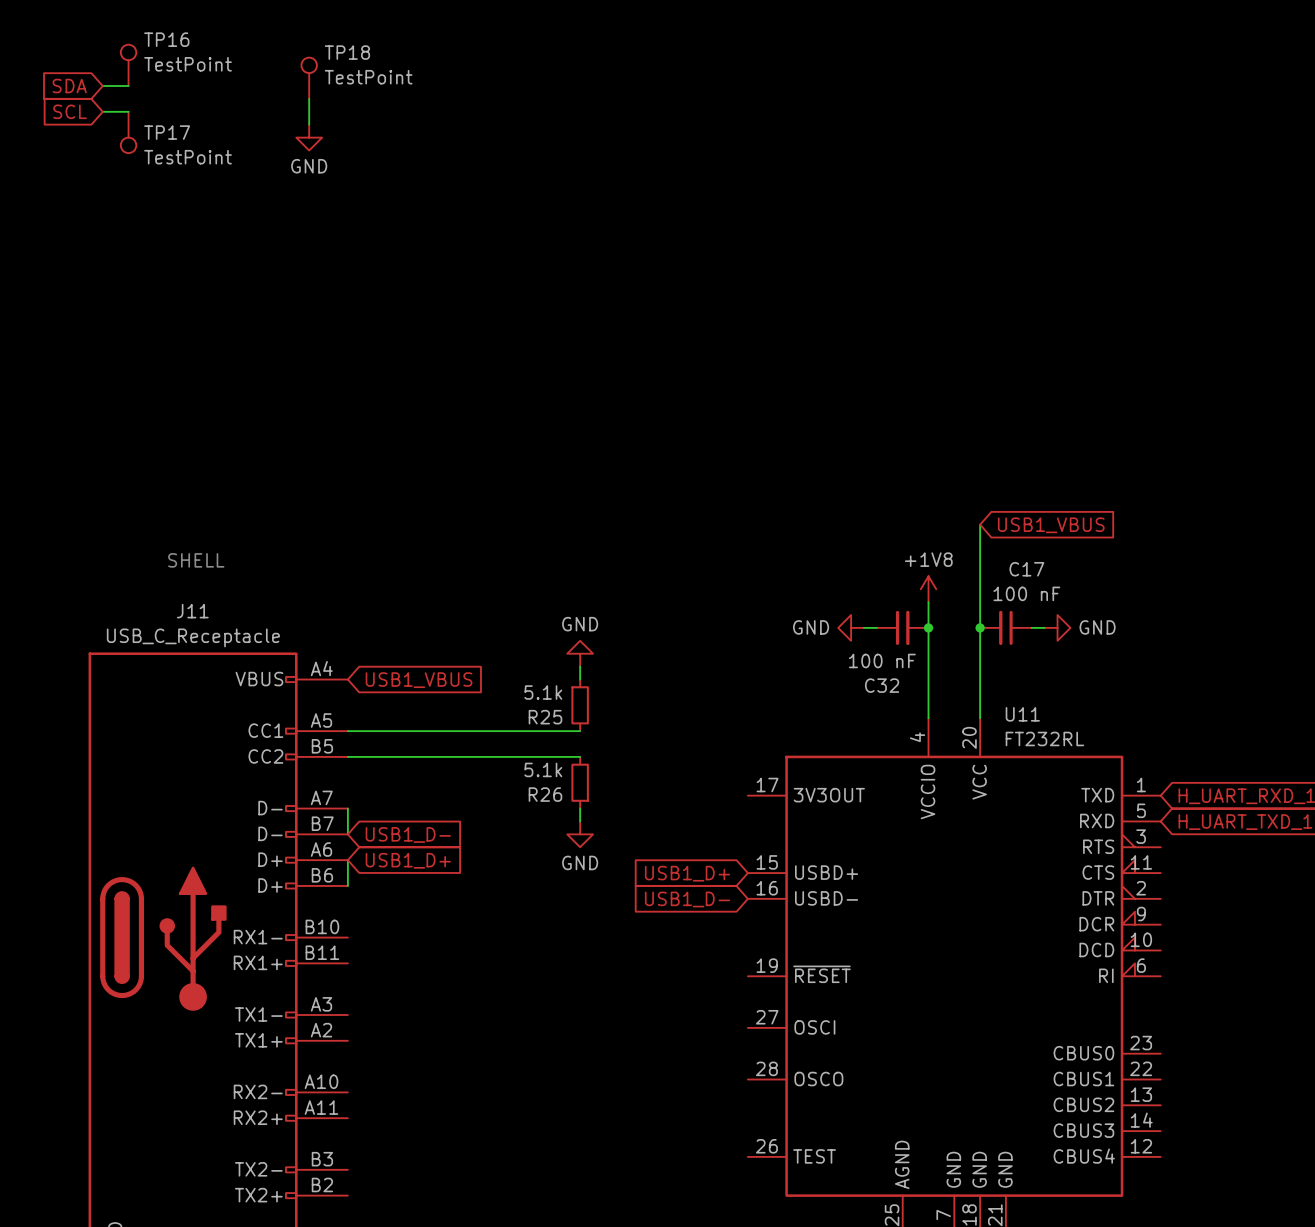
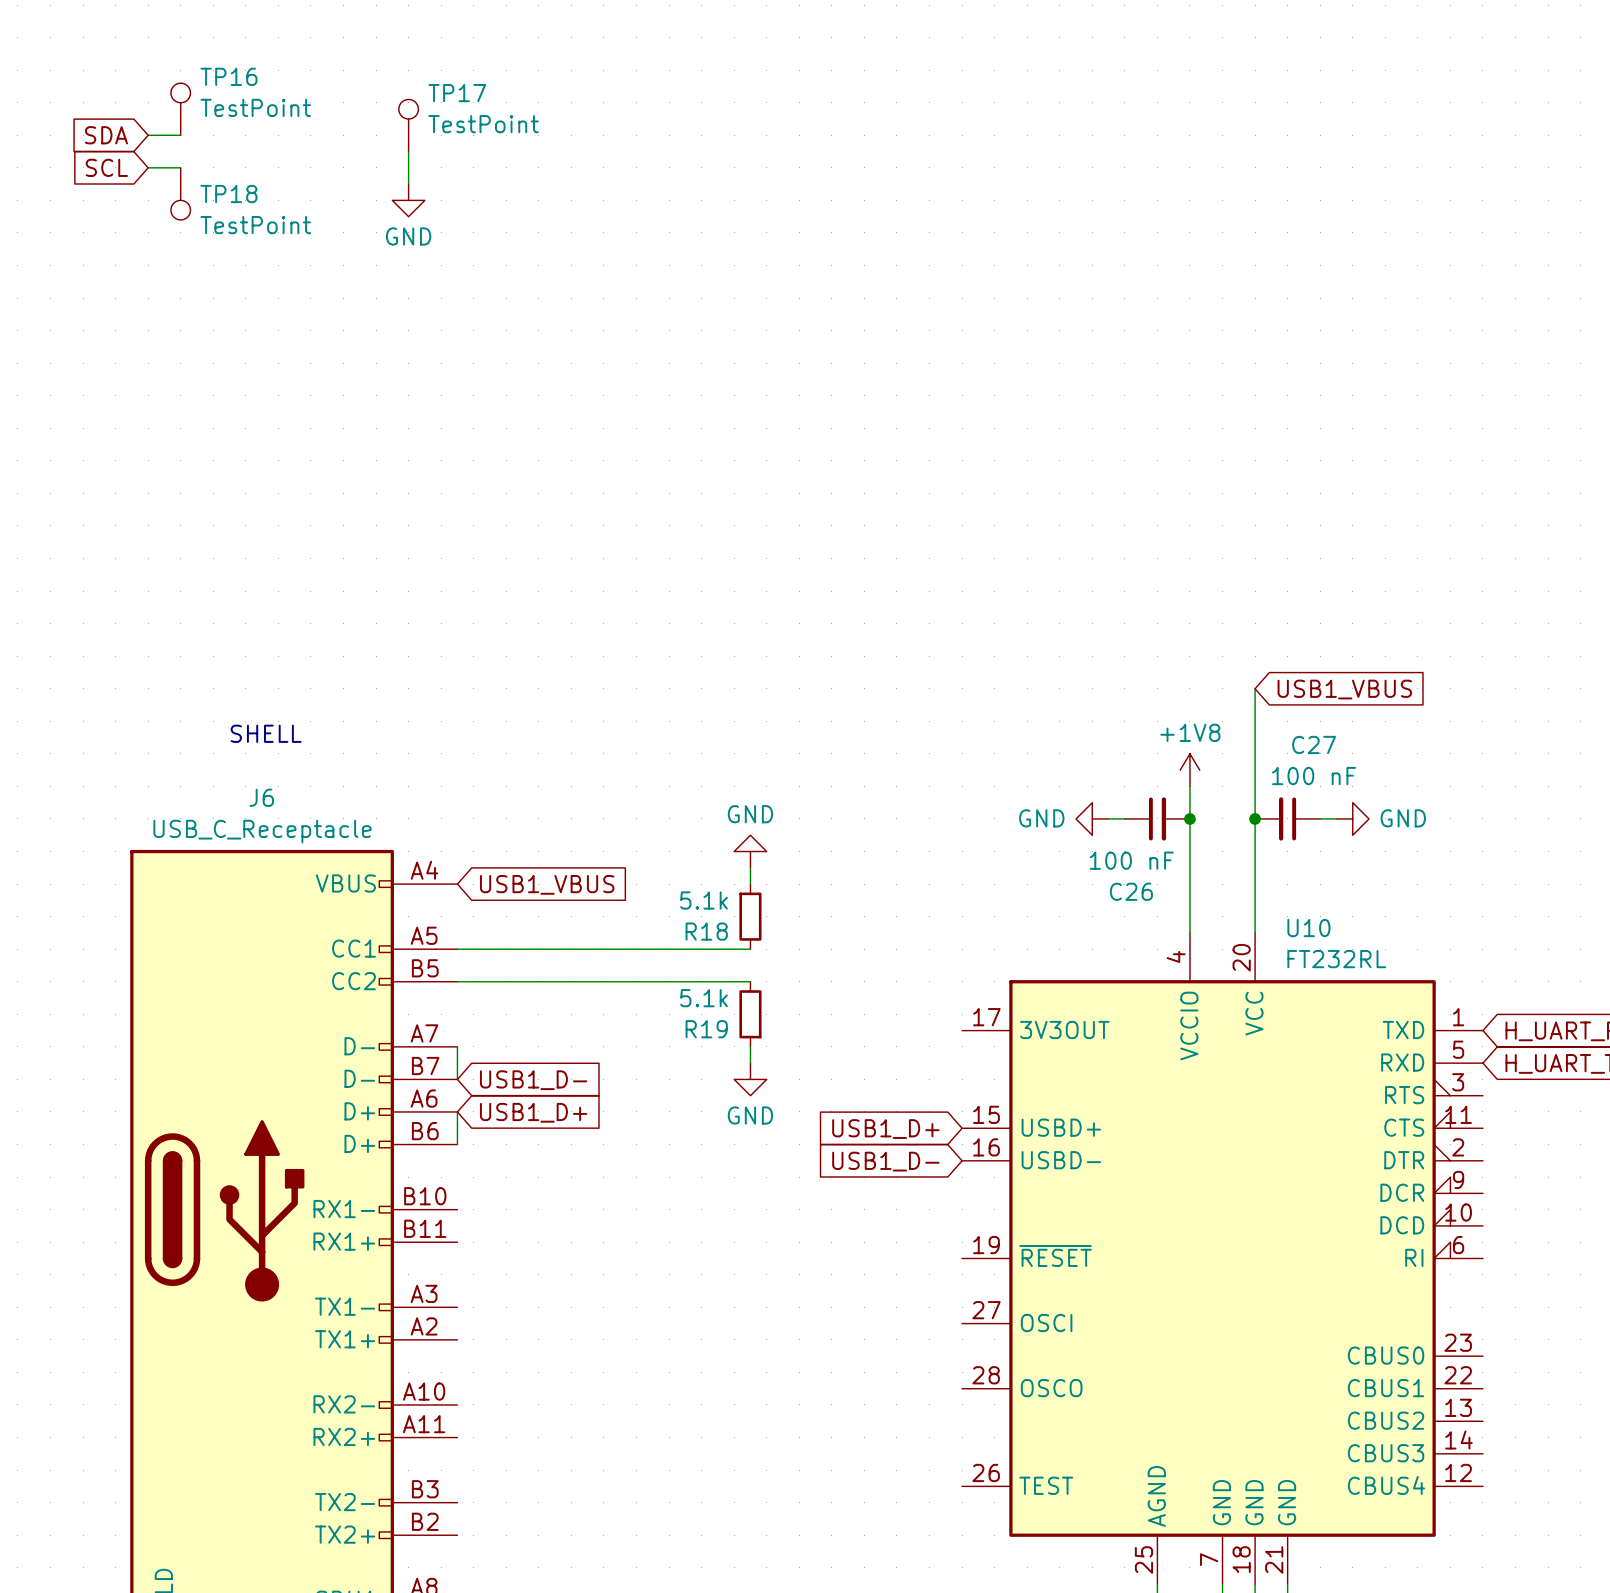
TP18 name: TP18 (347, 52) -> TP17 (457, 93)
TP17 name: TP17 (167, 132) -> TP18 (228, 194)
C17 name: C17 (1026, 569) -> C27 (1314, 744)
J11 name: J11 (192, 611) -> J6 (261, 797)
C32 name: C32 (882, 685) -> C26 (1131, 891)
U11 name: U11 (1022, 714) -> U10 (1308, 928)
R25 name: R25 (545, 717) -> R18 (706, 931)
R26 name: R26 (545, 794) -> R19 (706, 1029)

